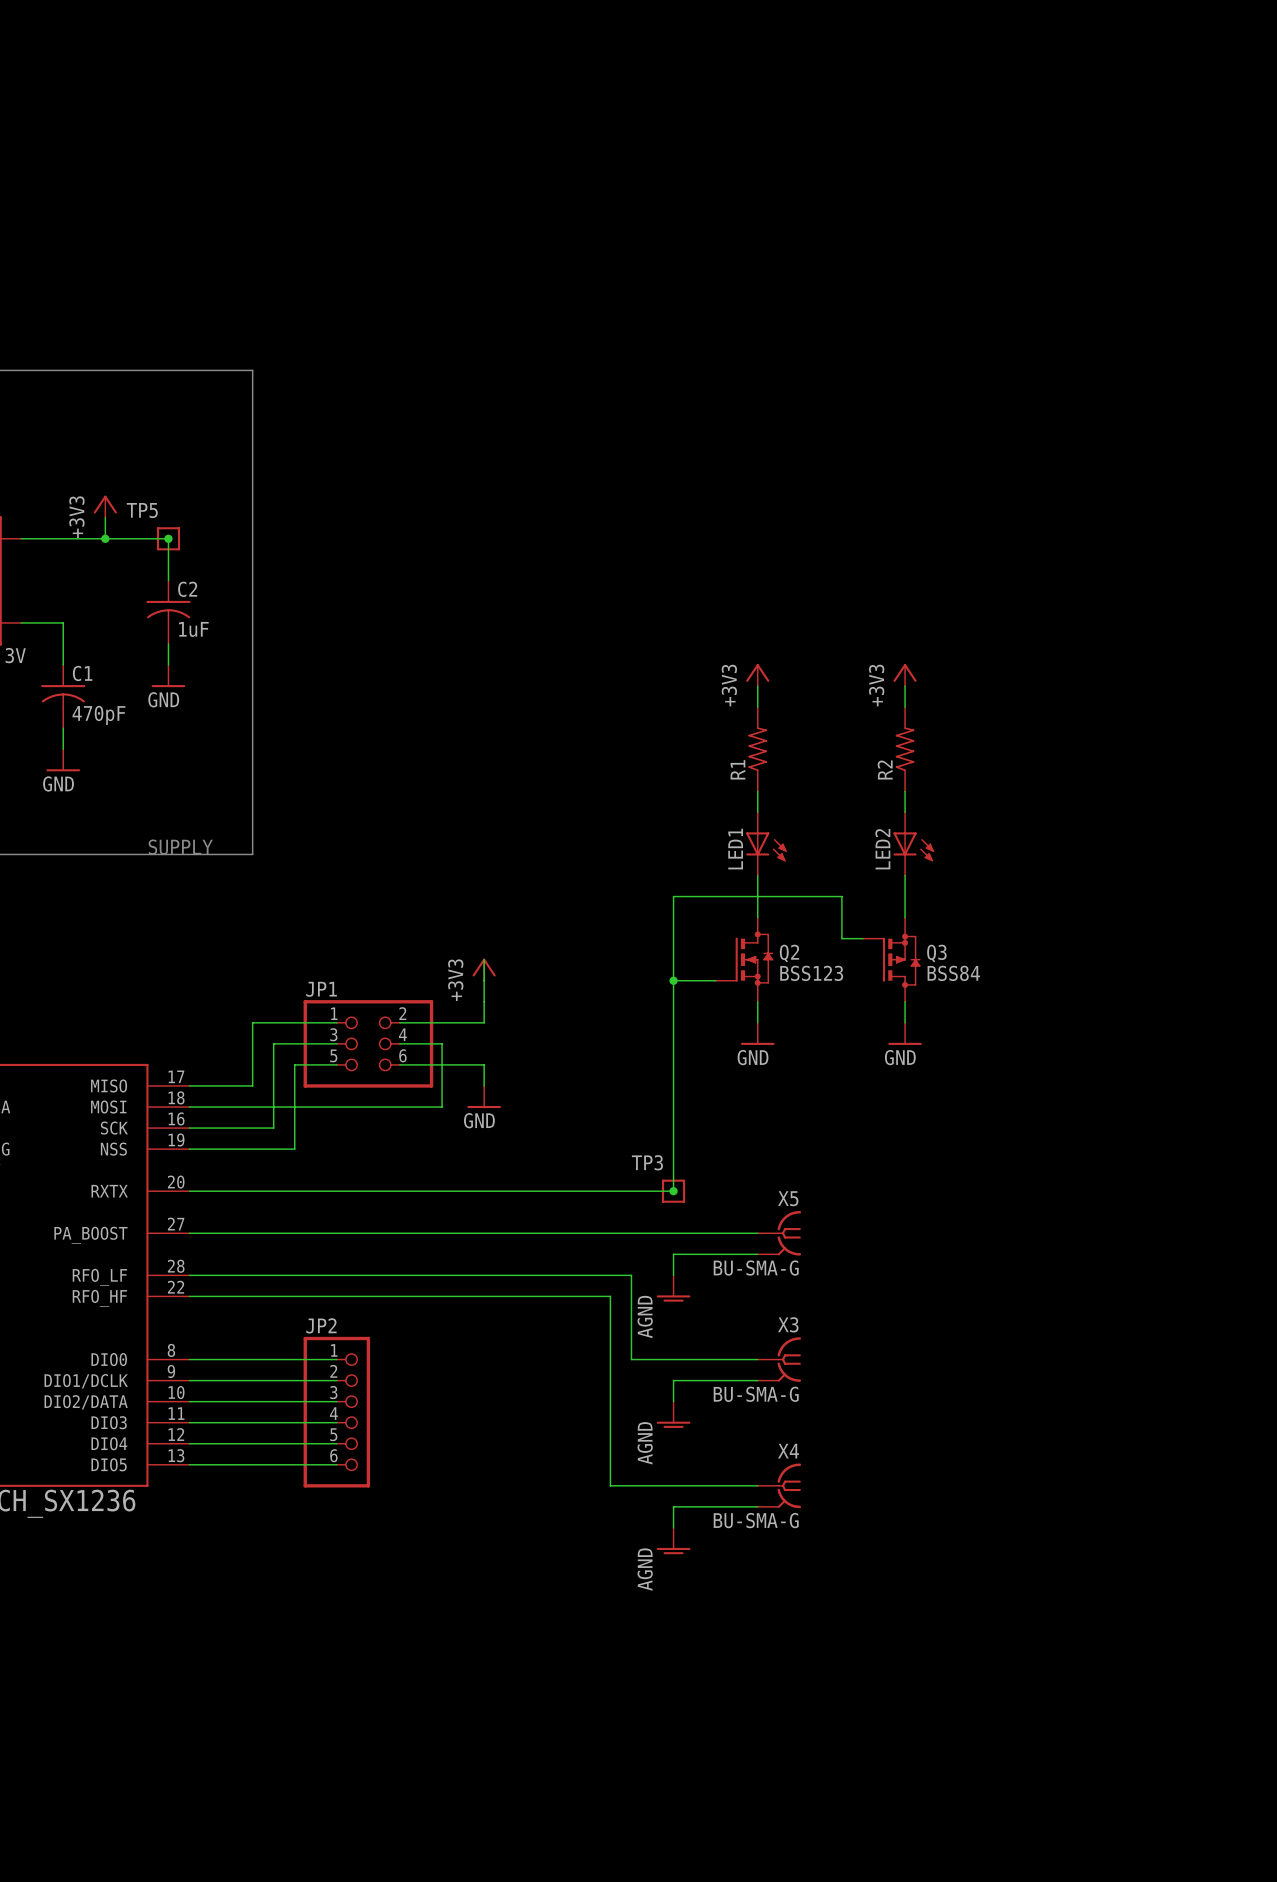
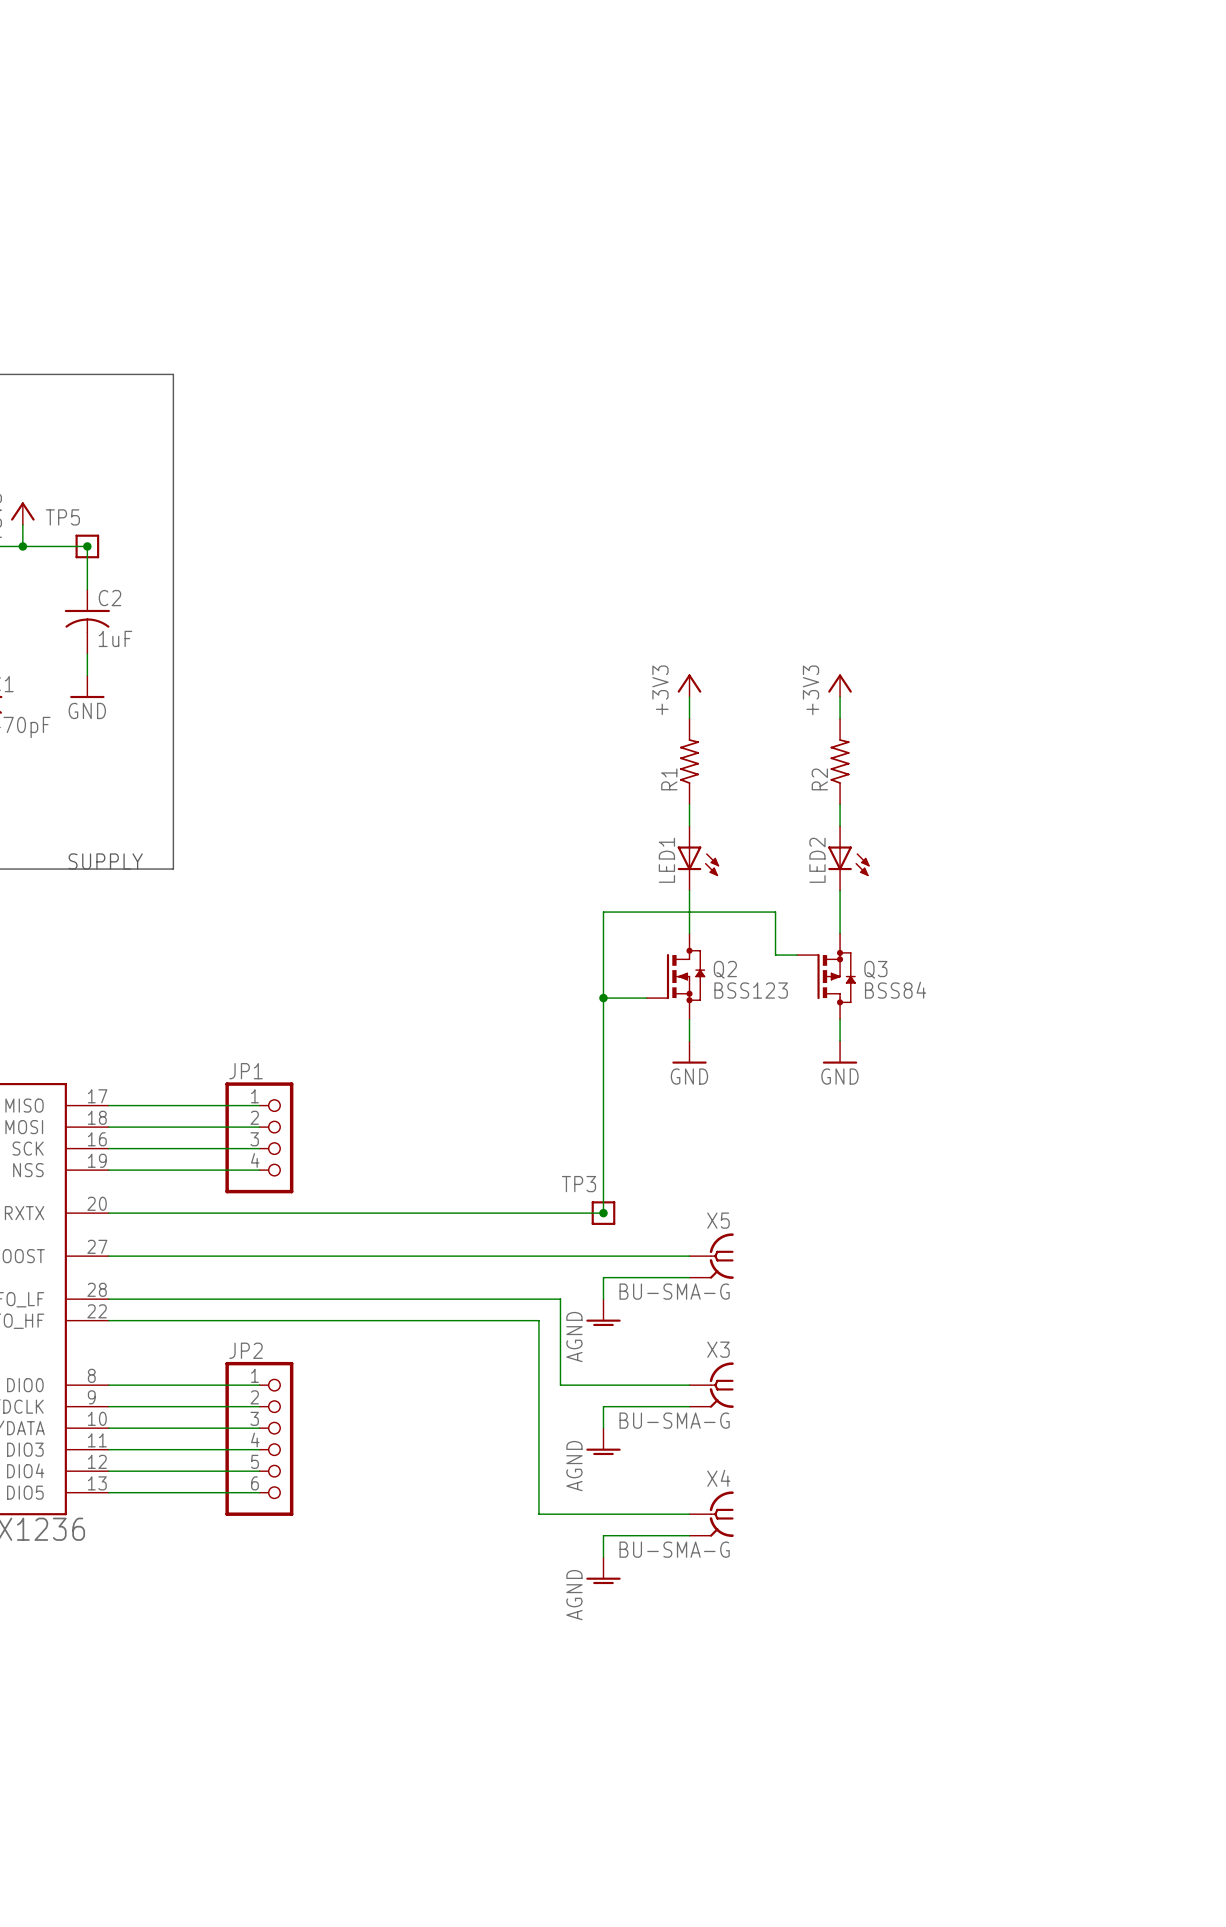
wire: (484, 959) (484, 1022) (399, 1022) -> none
power symbol: +3V3 (484, 969) -> none
JP1 name position: JP1 (321, 989) -> JP1 (246, 1071)
JP1 symbol: [303, 1000, 434, 1088] -> [225, 1082, 294, 1194]
wire: (336, 1022) (252, 1022) (252, 1085) -> (259, 1105) (173, 1105)
wire: (336, 1043) (273, 1043) (273, 1128) -> (259, 1148) (194, 1148)
wire: (399, 1043) (442, 1043) (442, 1107) (336, 1107) -> none
wire: (336, 1064) (294, 1064) (294, 1149) -> (259, 1170) (216, 1170)
wire: (399, 1064) (484, 1064) (484, 1085) -> none
power symbol: GND (484, 1097) -> none

